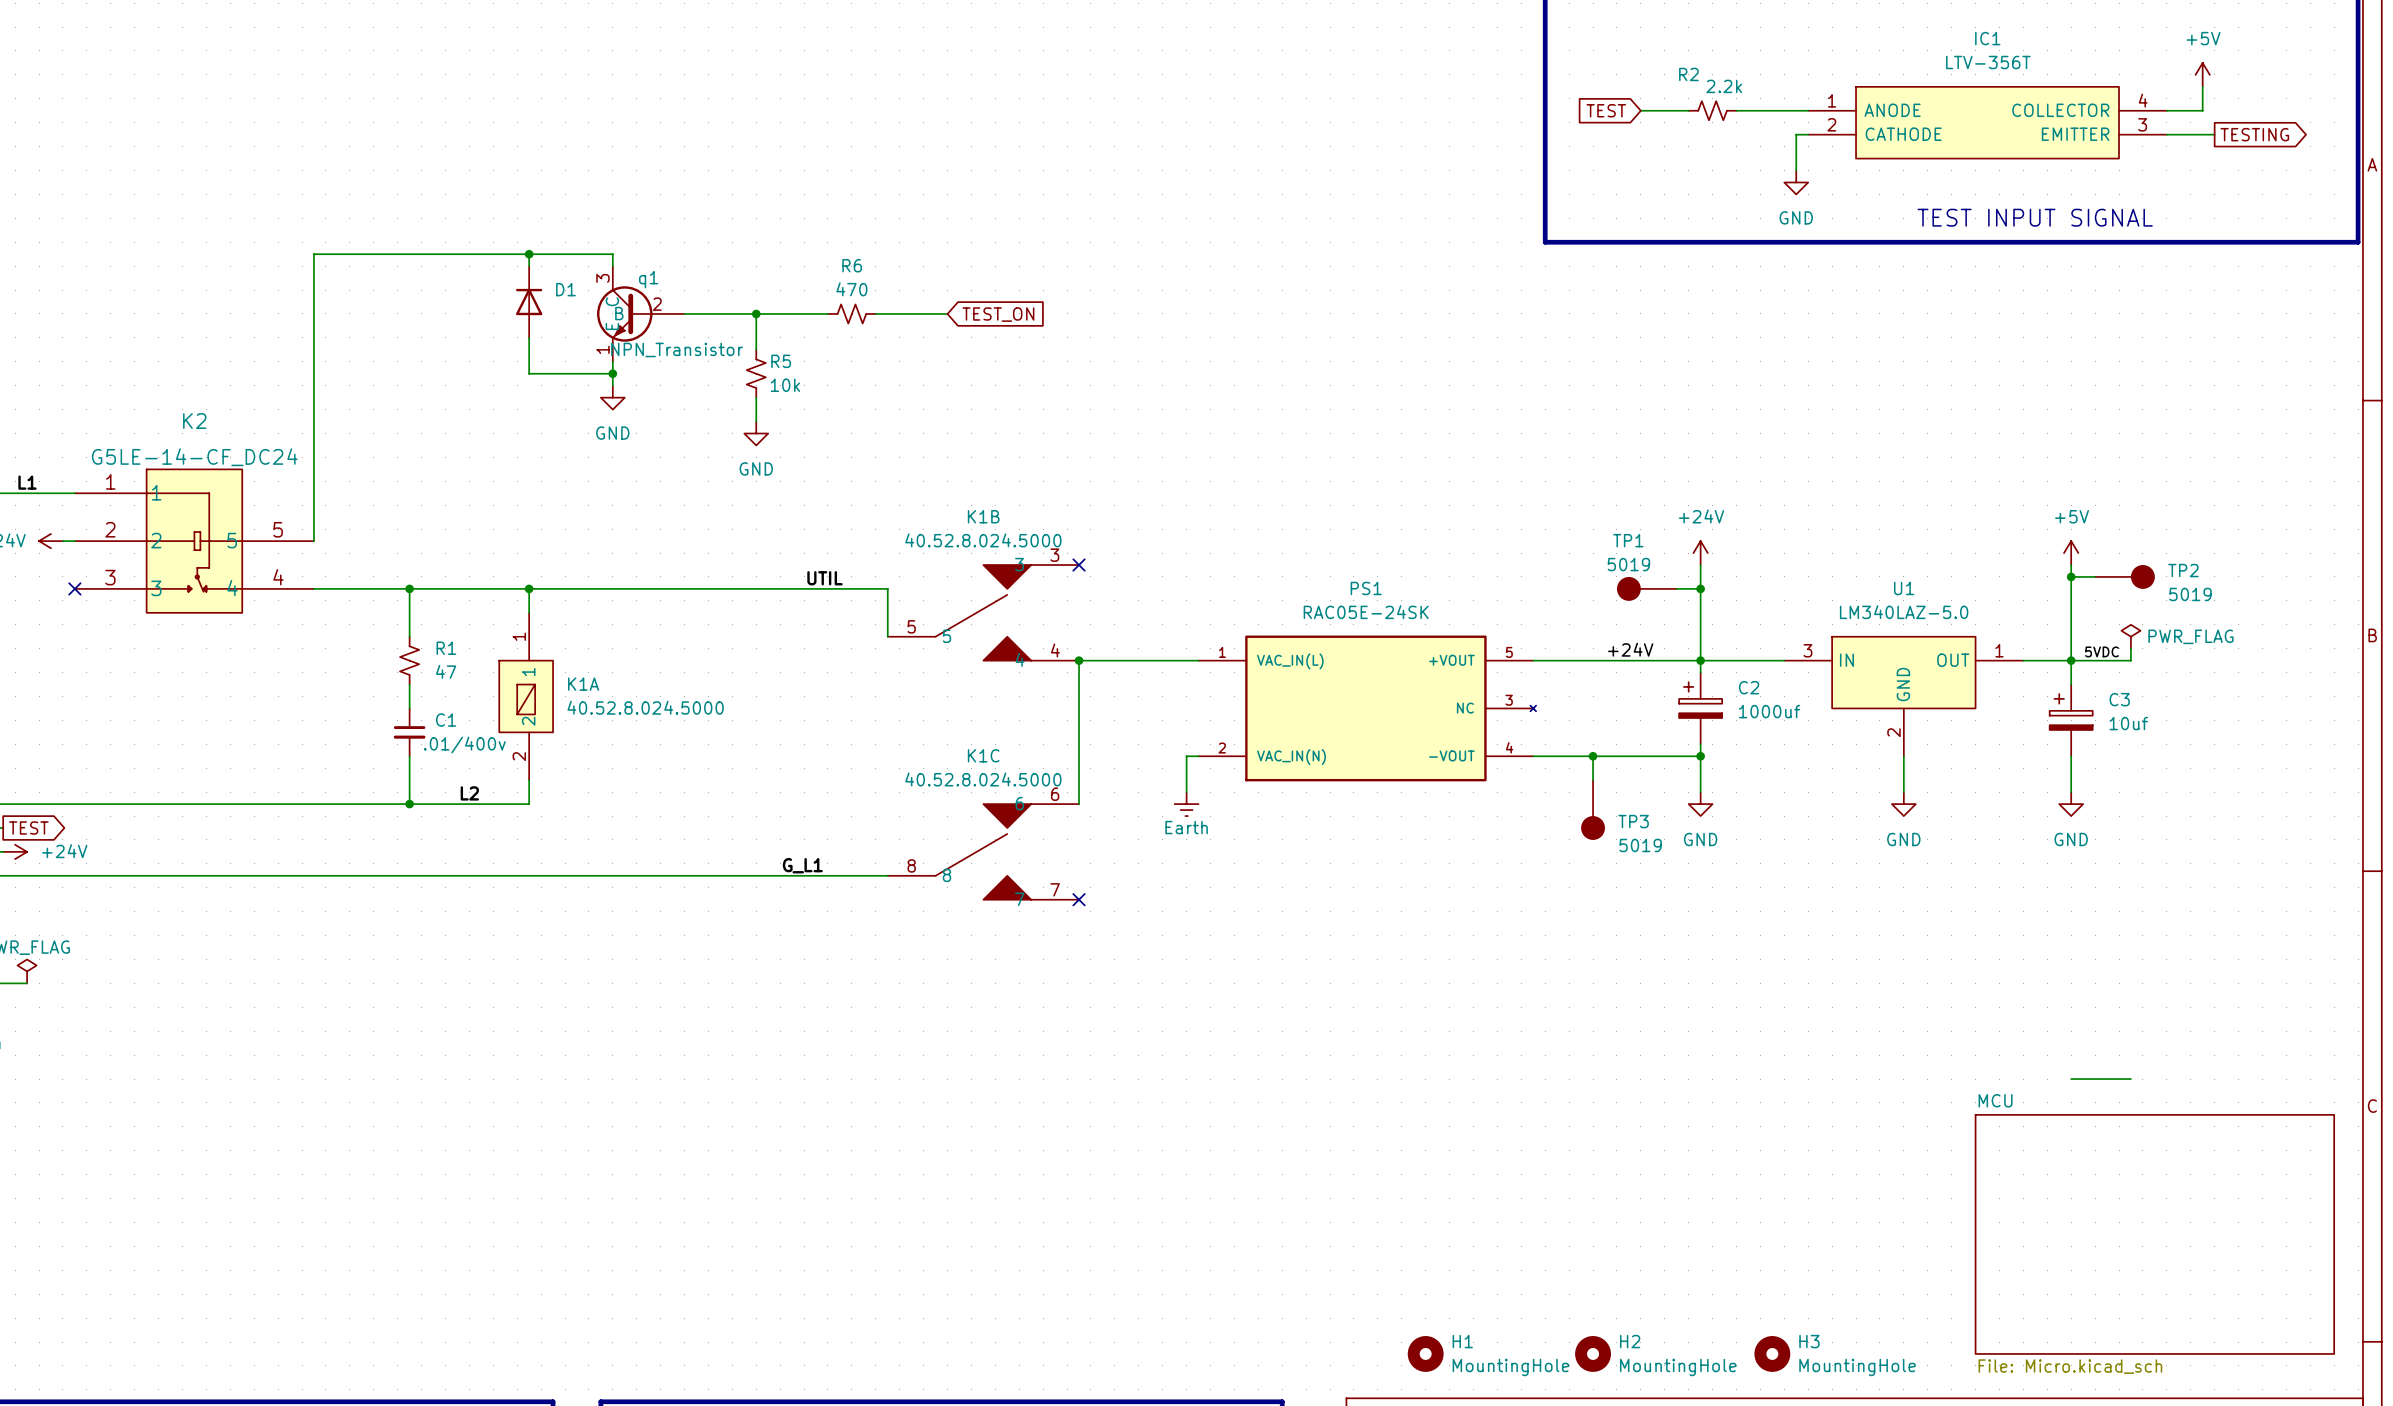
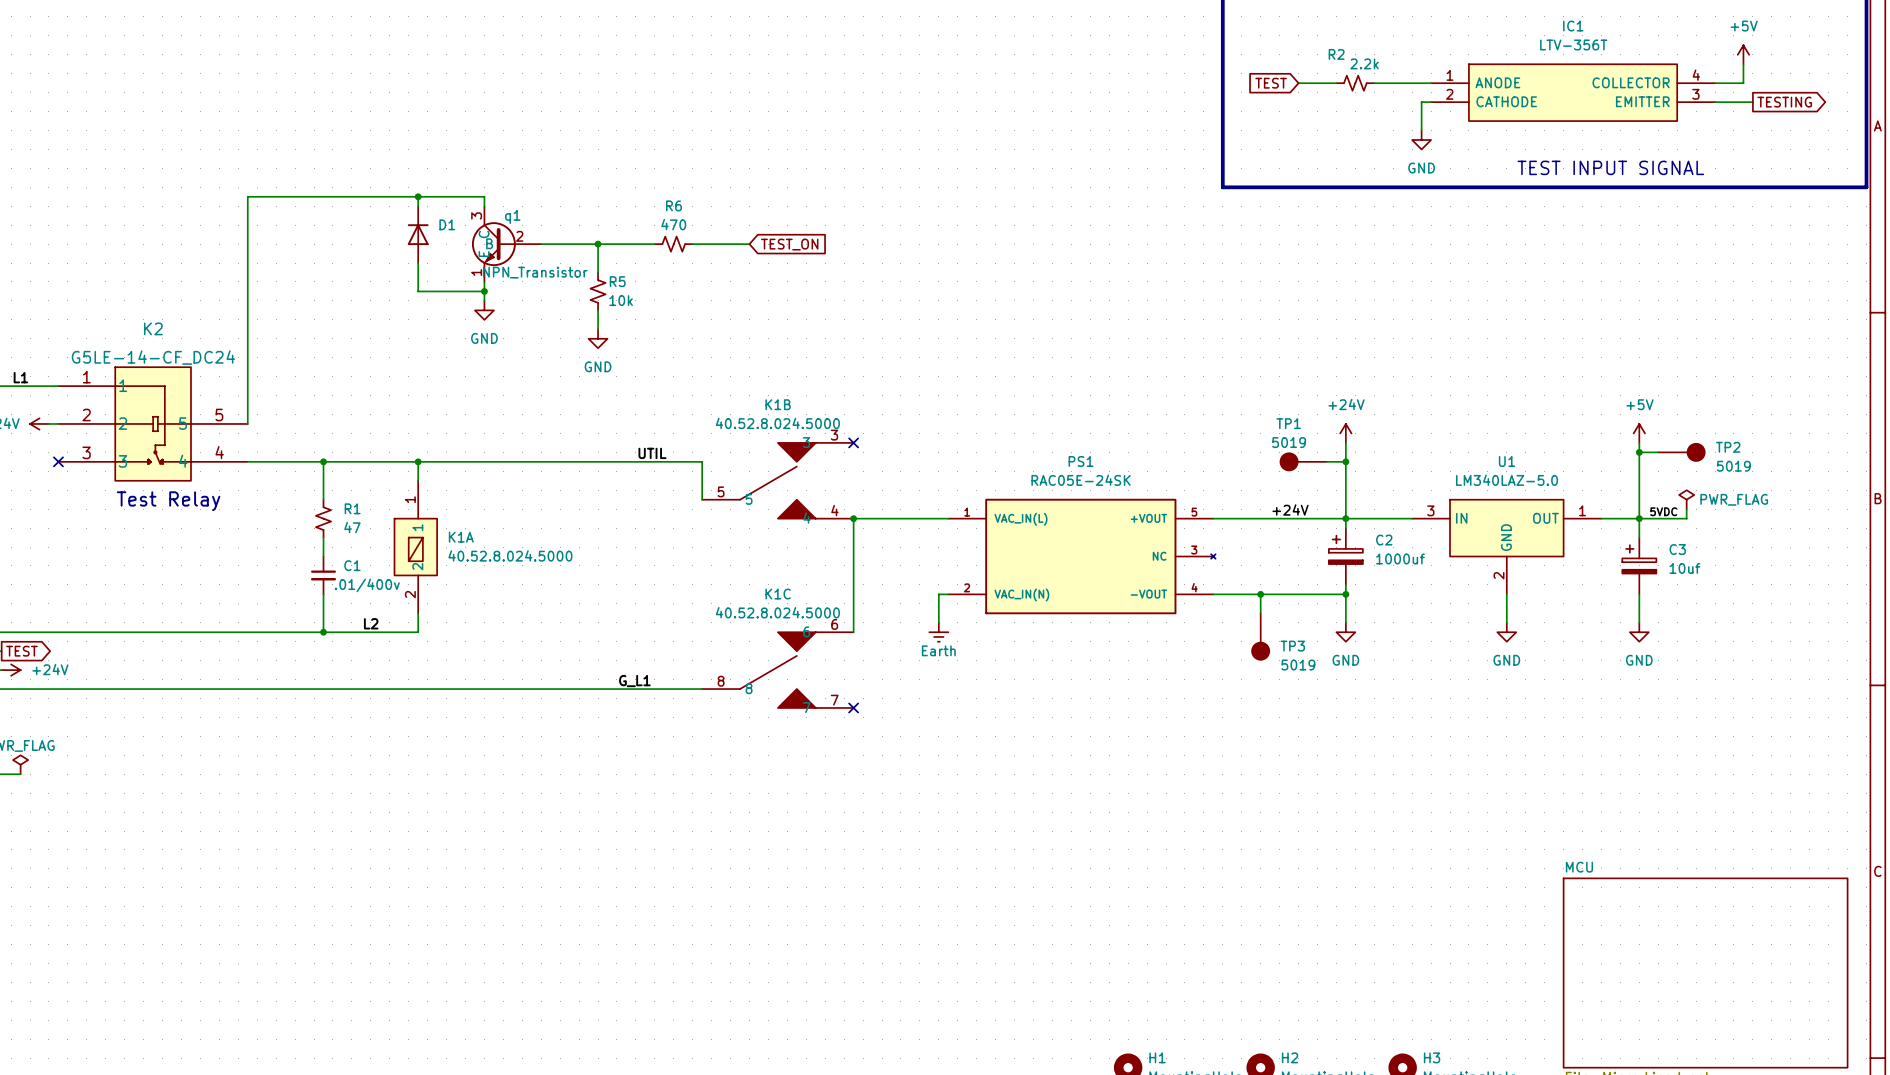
text: none -> Test Relay (168, 501)
wire: (2071, 1079) (2130, 1079) -> none

